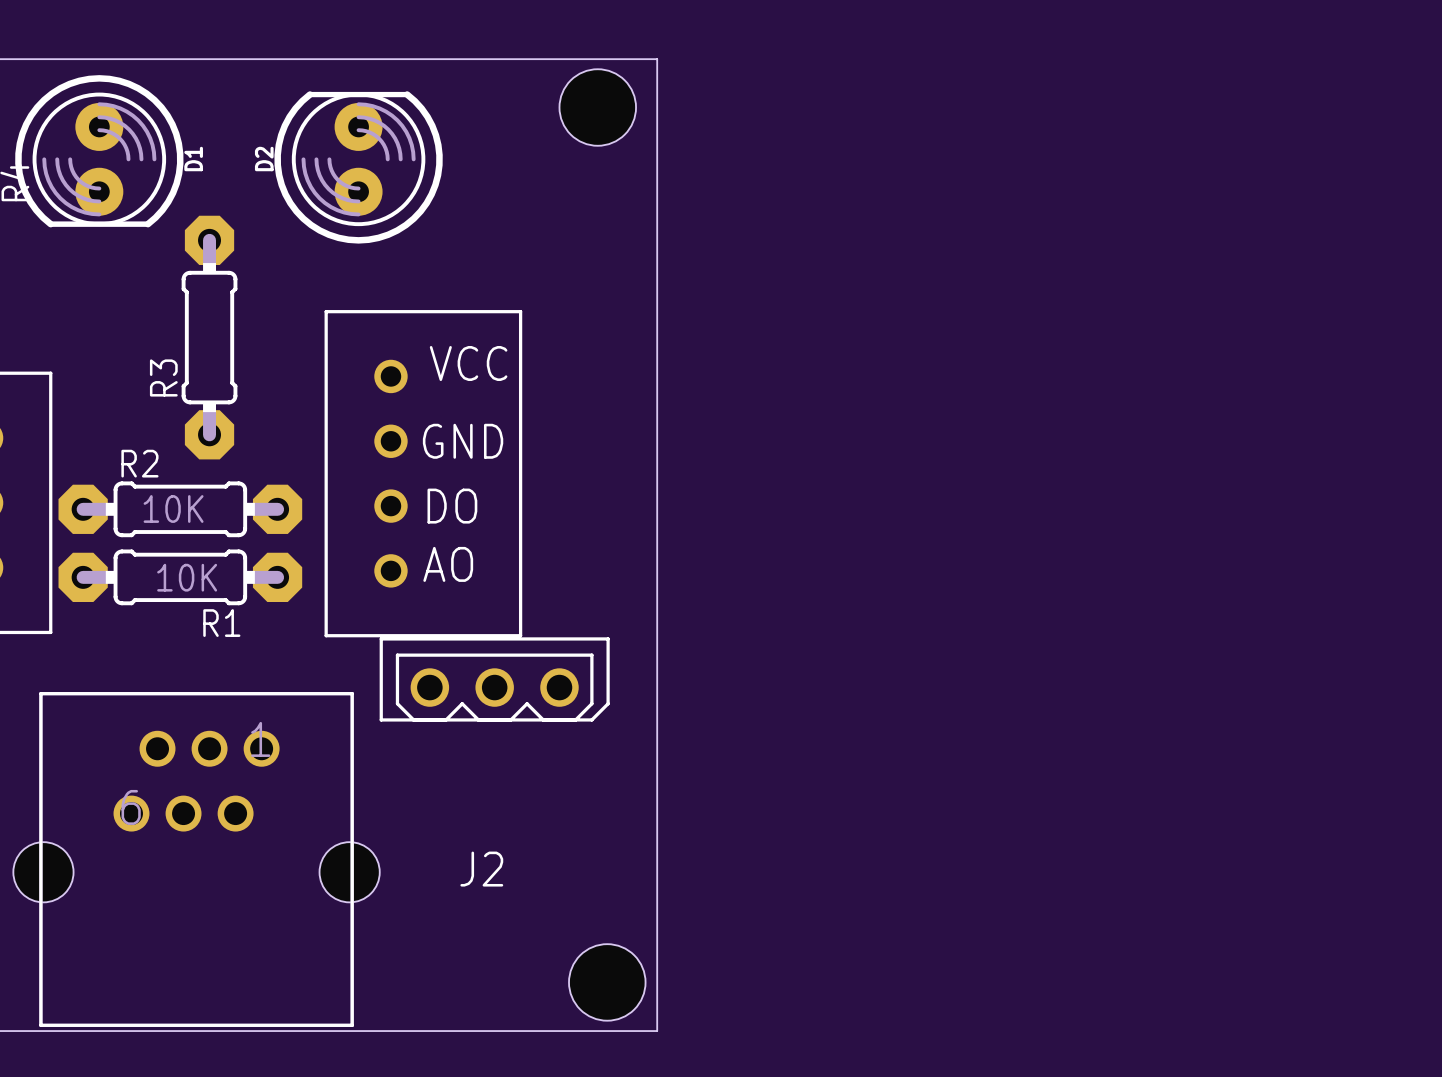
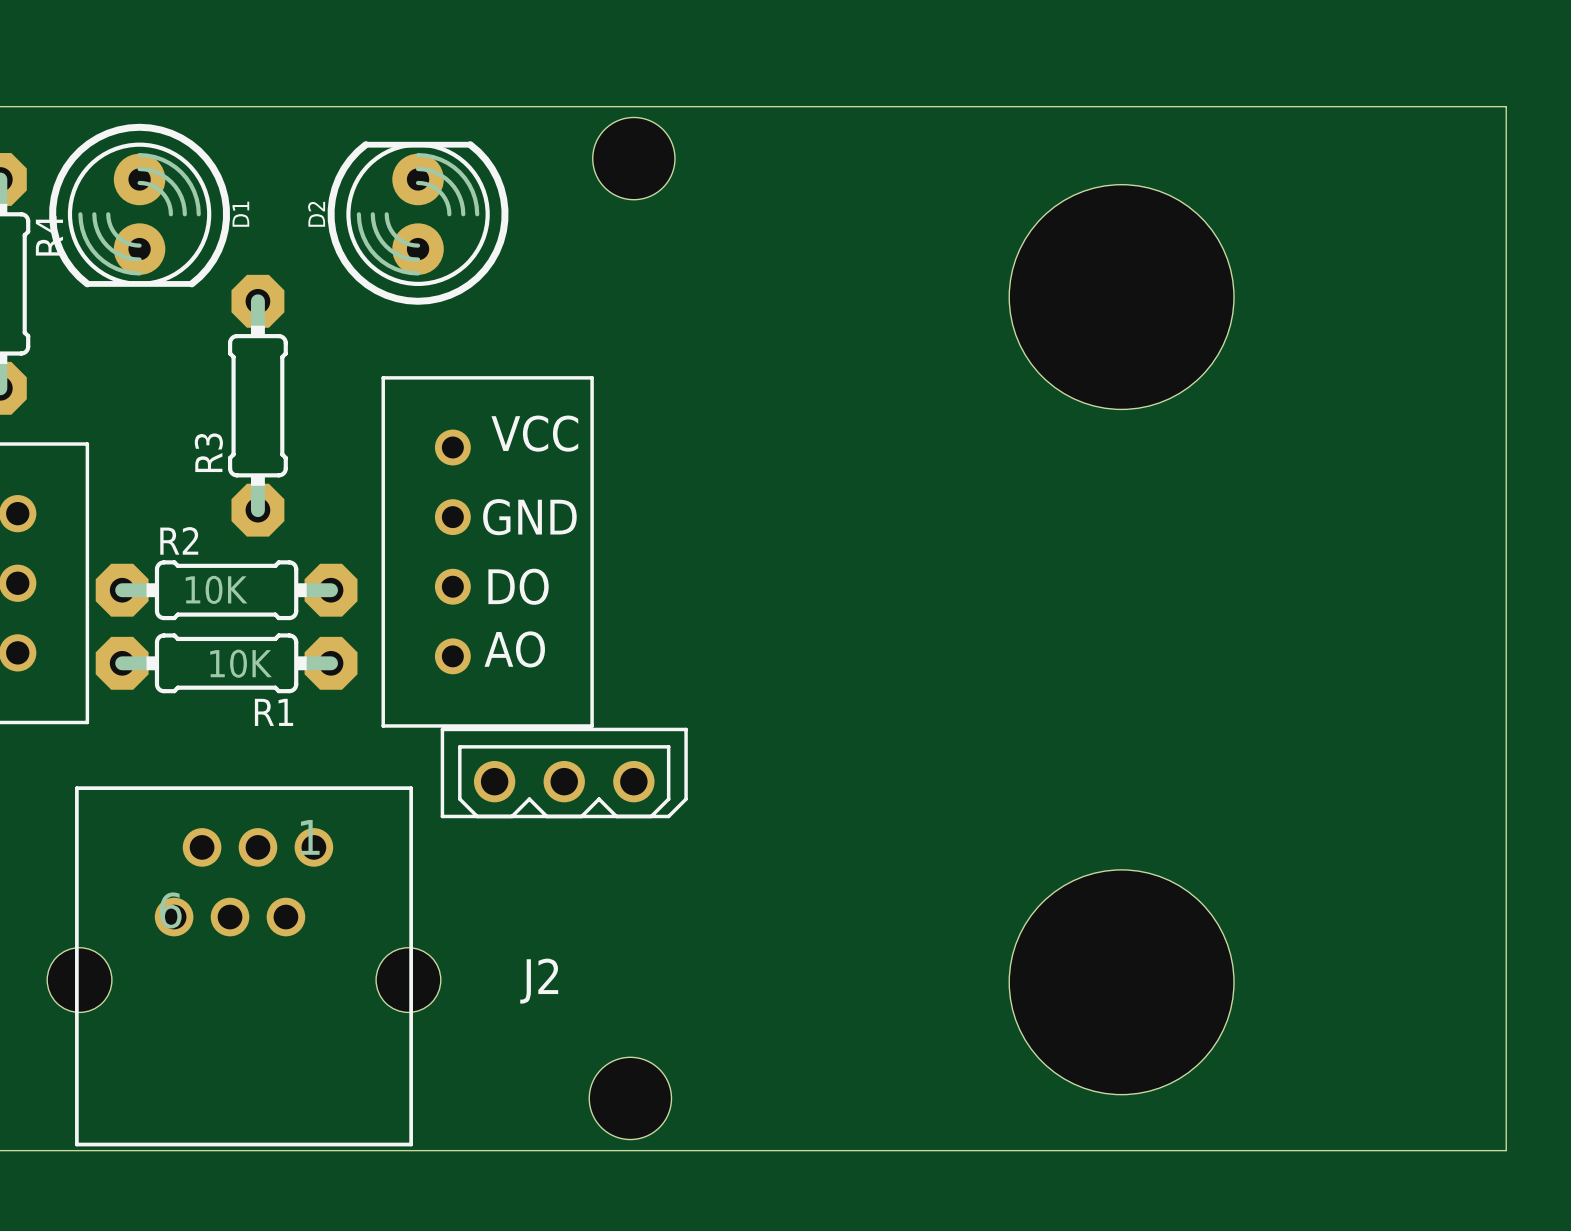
board edge: (657, 59) (657, 1031) -> (738, 106) (1506, 106) (1506, 1150) (738, 1150)
hole position: (597, 107) -> (633, 158)
hole: none -> (1121, 297)
hole: none -> (1121, 982)
hole position: (607, 982) -> (630, 1098)

